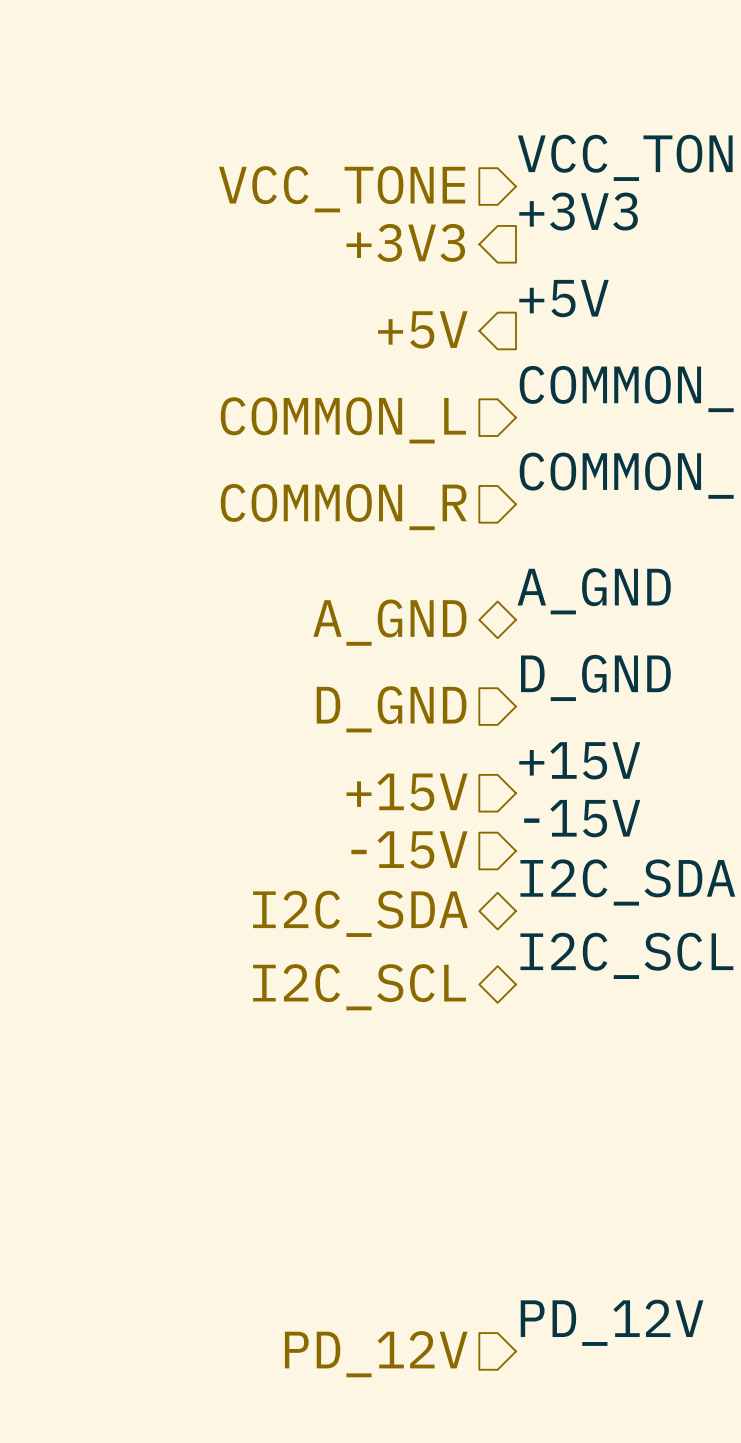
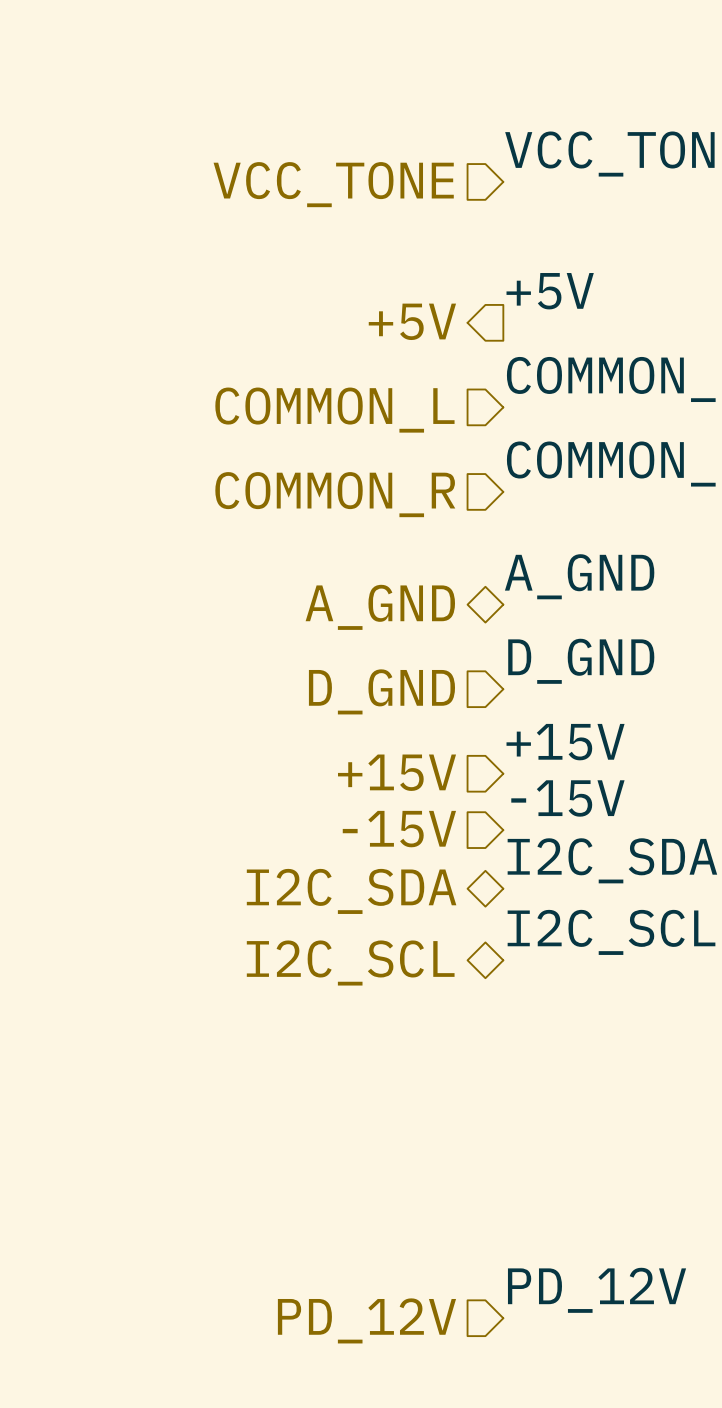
label: +3V3 (578, 211) -> none
hierarchical label: +3V3 (405, 242) -> none

